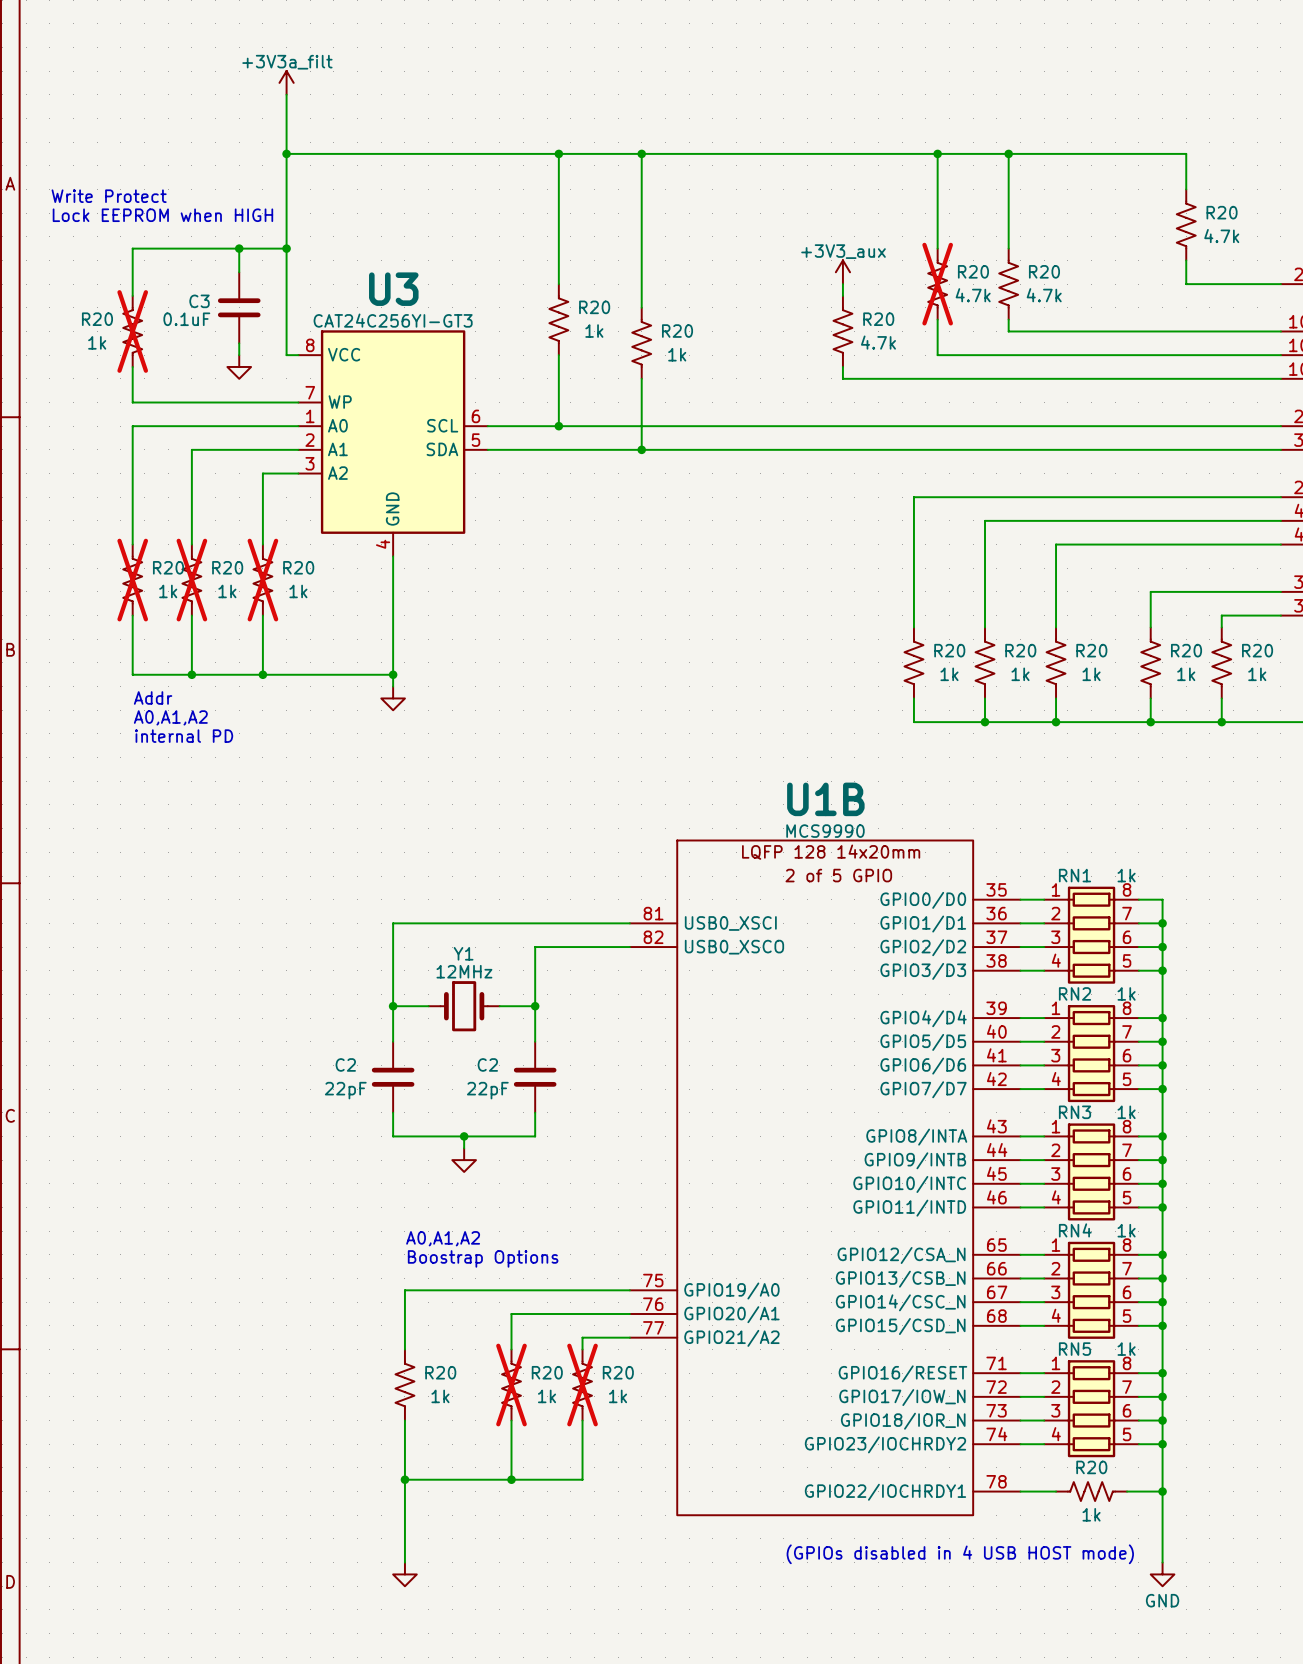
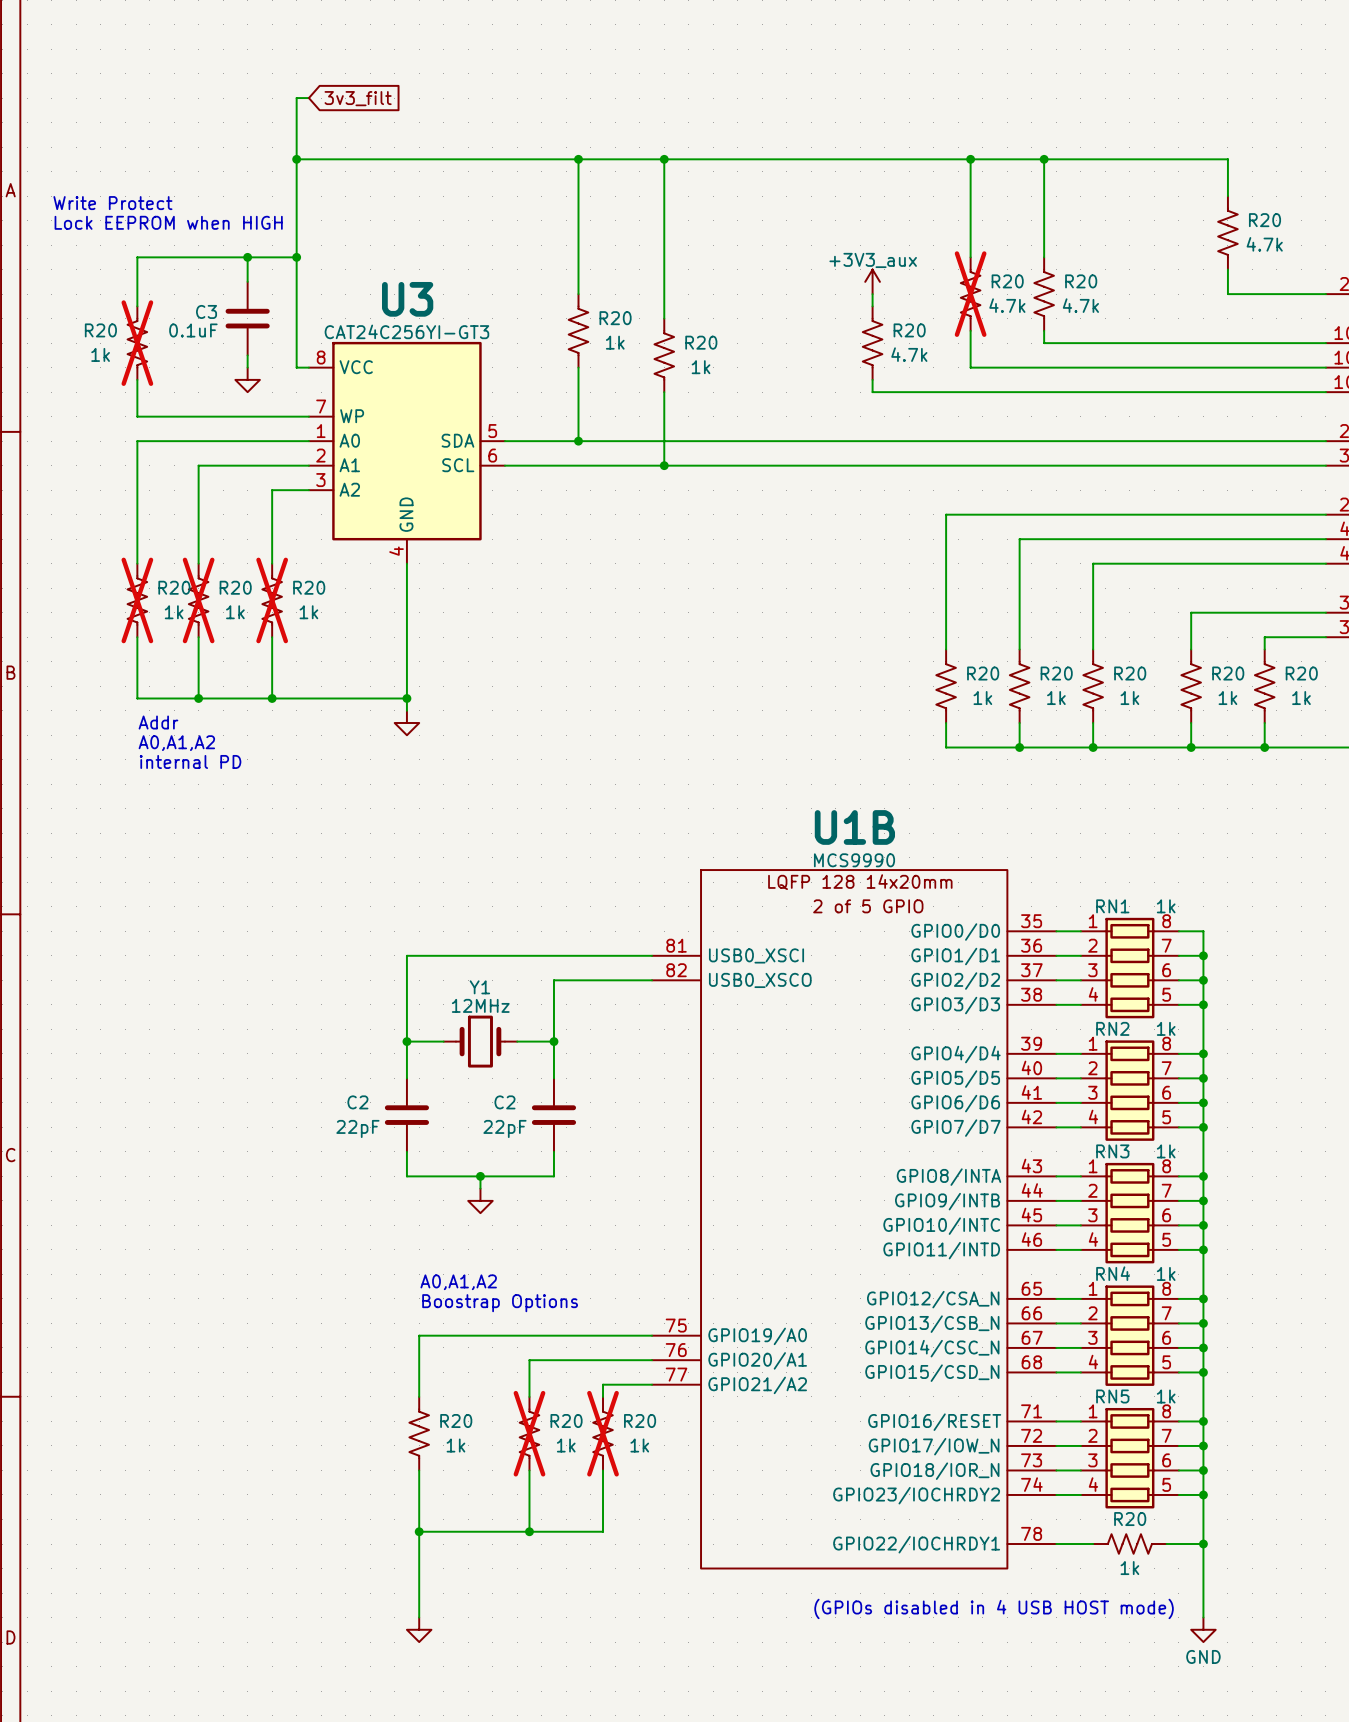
power symbol: +3V3a_filt (286, 82) -> none
wire: none -> (296, 98) (308, 98)
global label: none -> 3v3_filt (358, 98)
U3 symbol: [298, 330, 488, 557] -> [308, 341, 505, 564]

